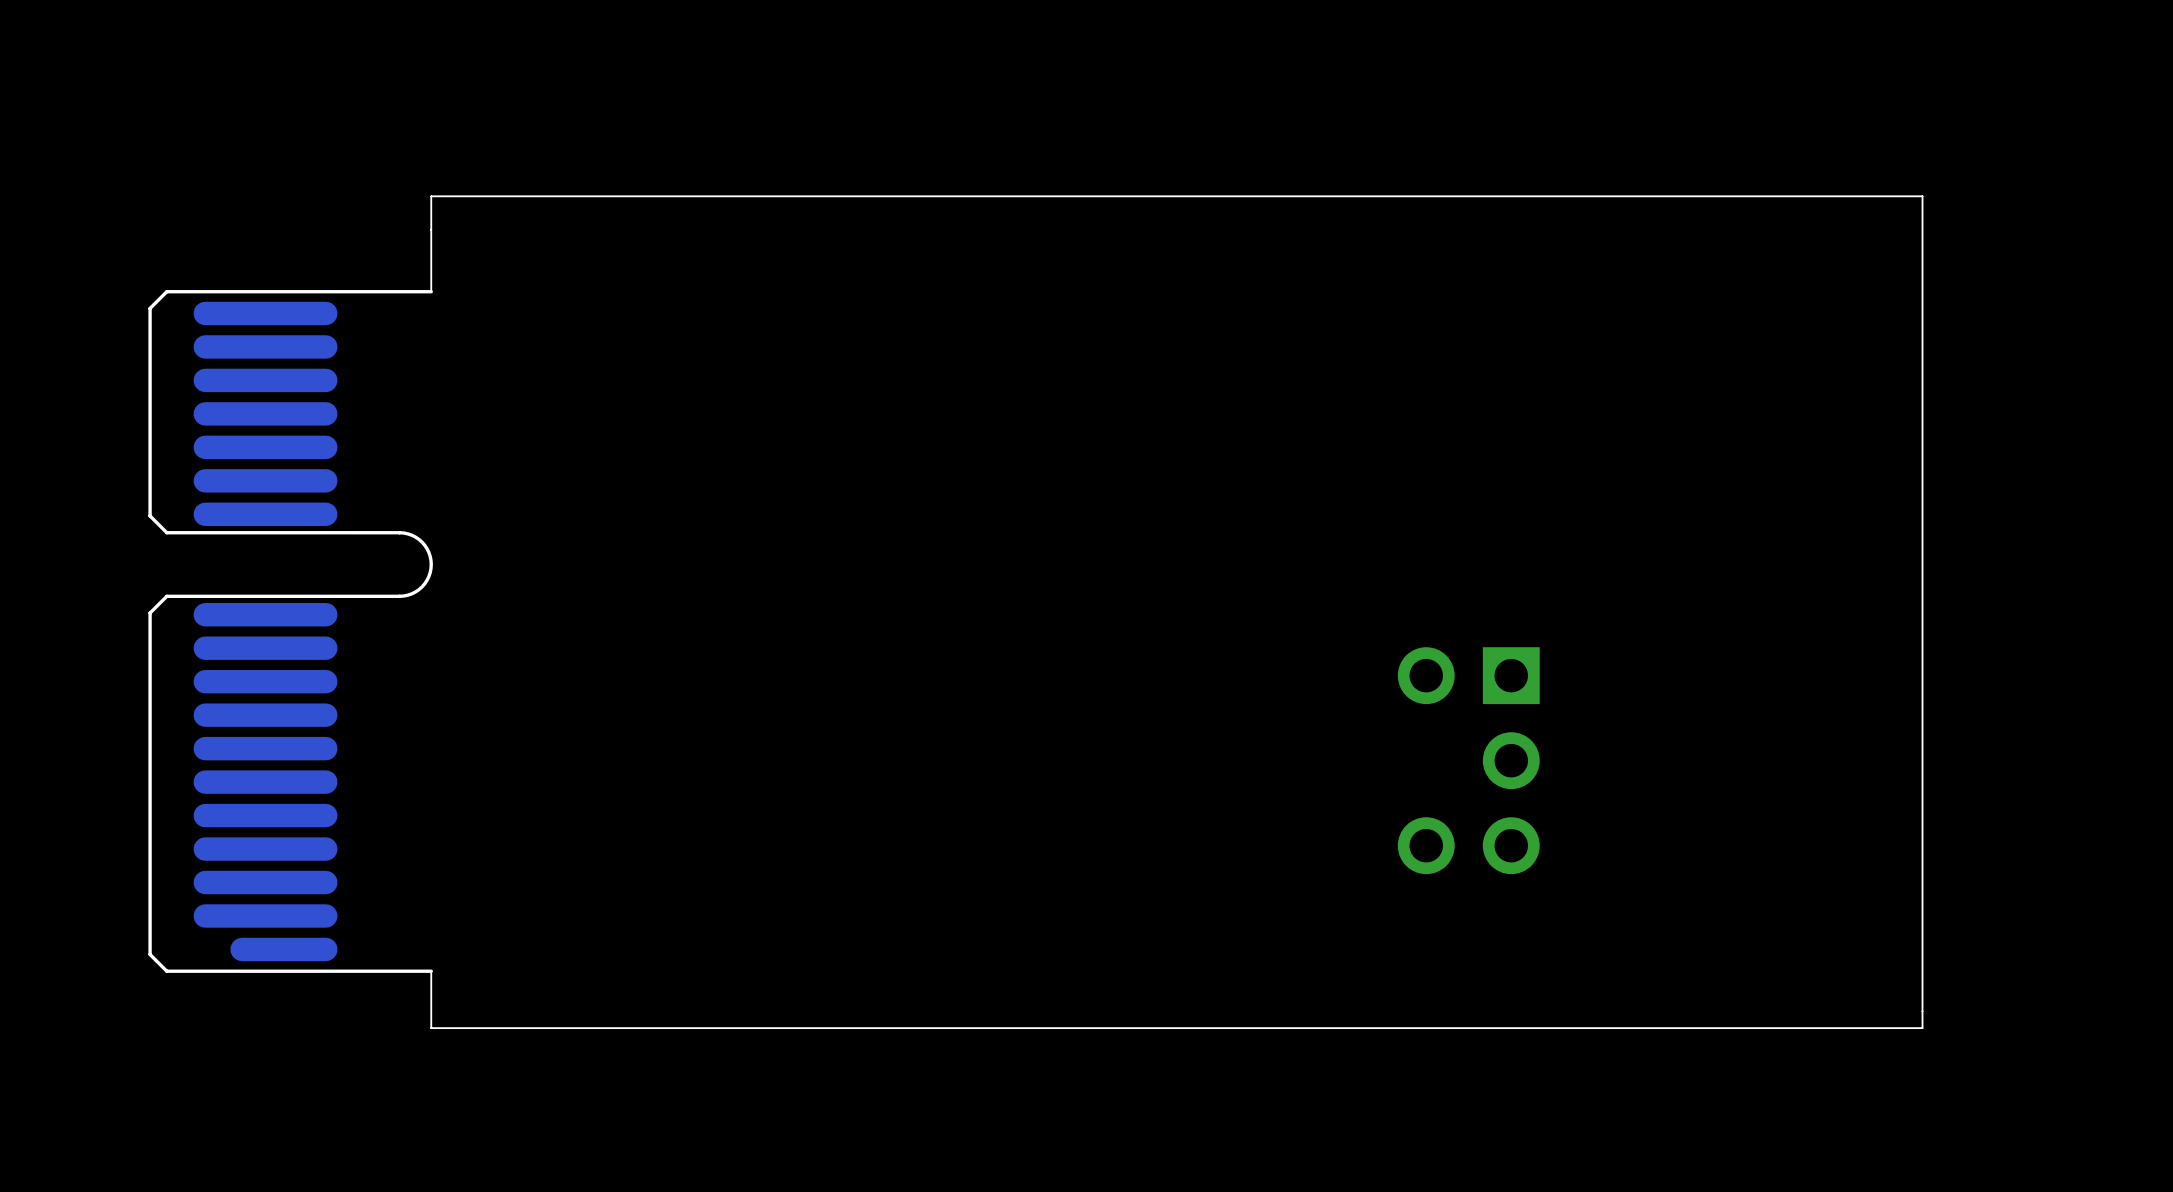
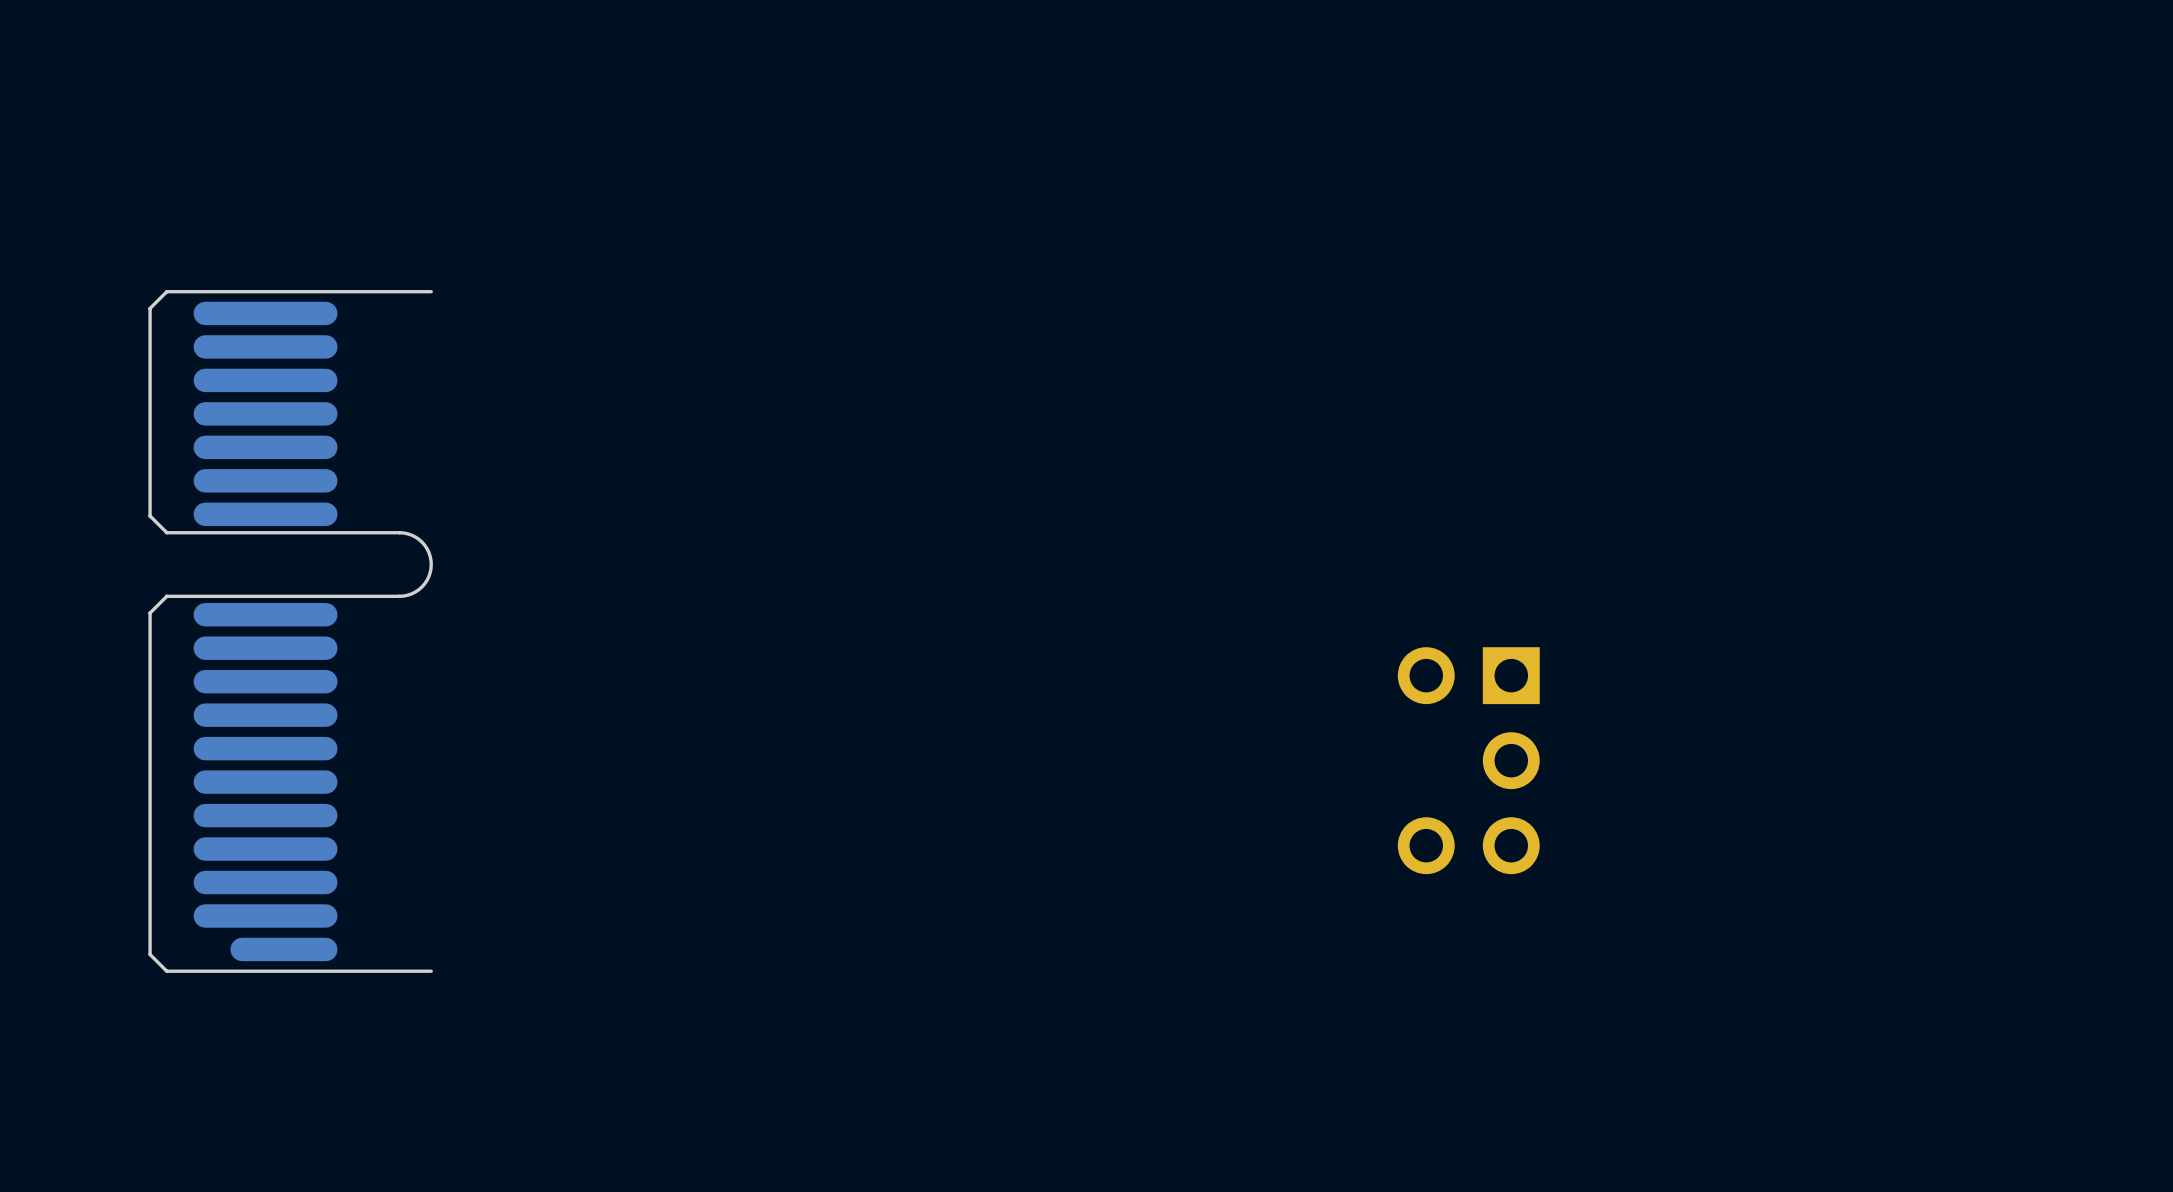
board edge: (431, 291) (431, 196) (1922, 196) (1922, 1028) (431, 1028) (431, 971) -> none

